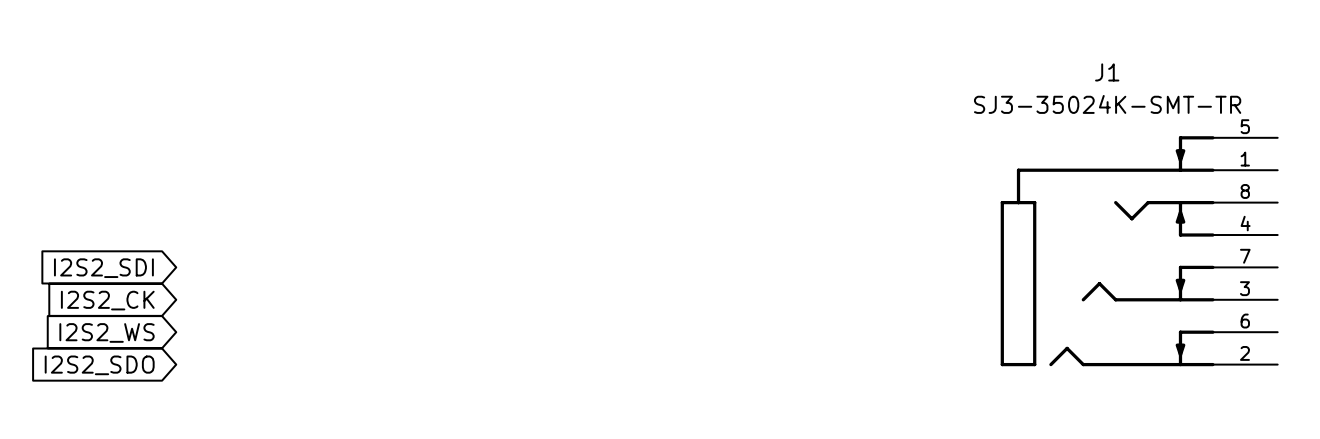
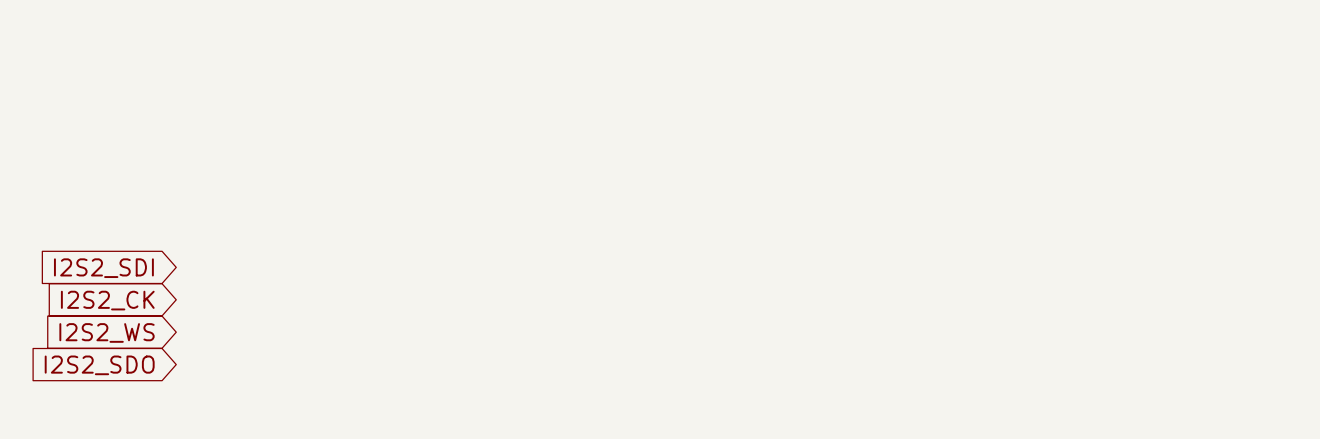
J1: SJ3-35024K-SMT-TR (1139, 251) -> none

